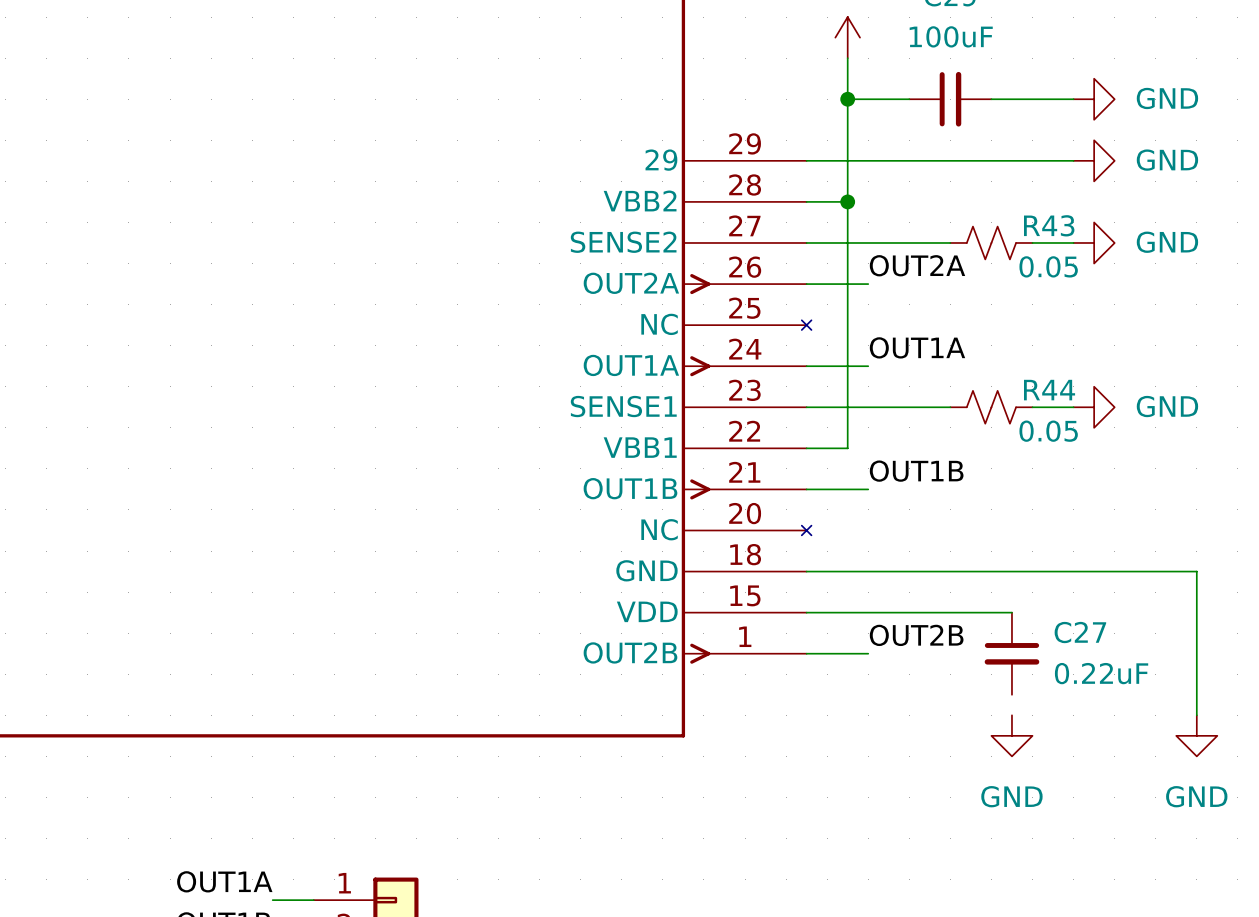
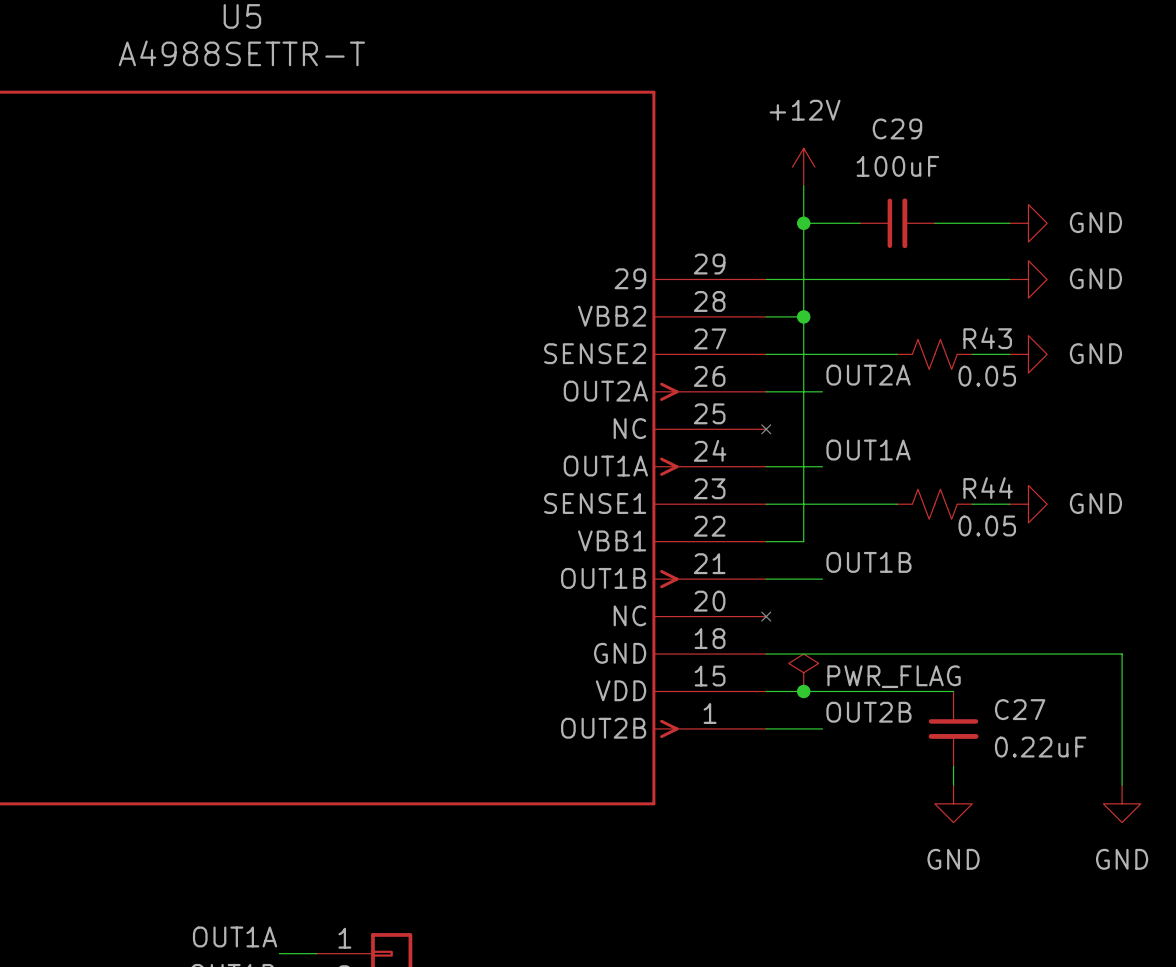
power symbol: none -> PWR_FLAG (803, 672)
junction: none -> (803, 691)
wire: none -> (953, 766) (953, 785)

